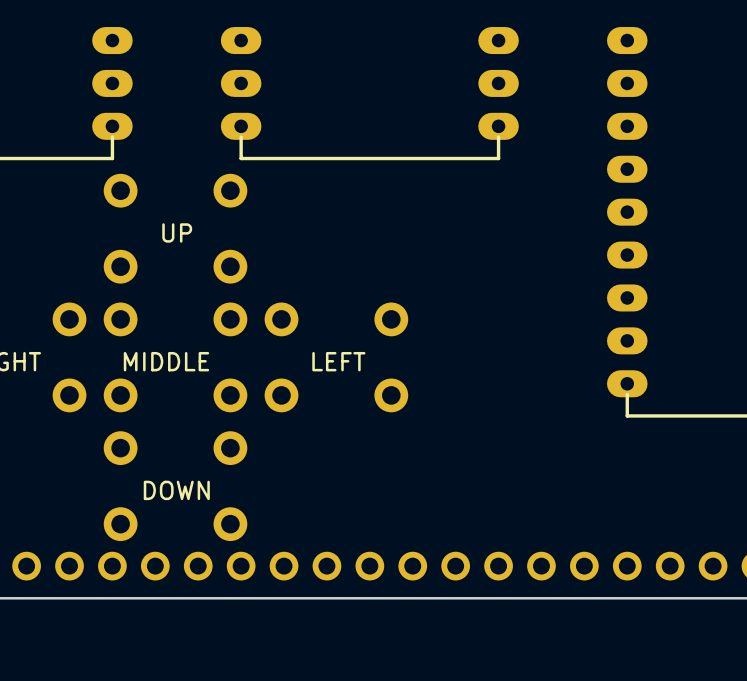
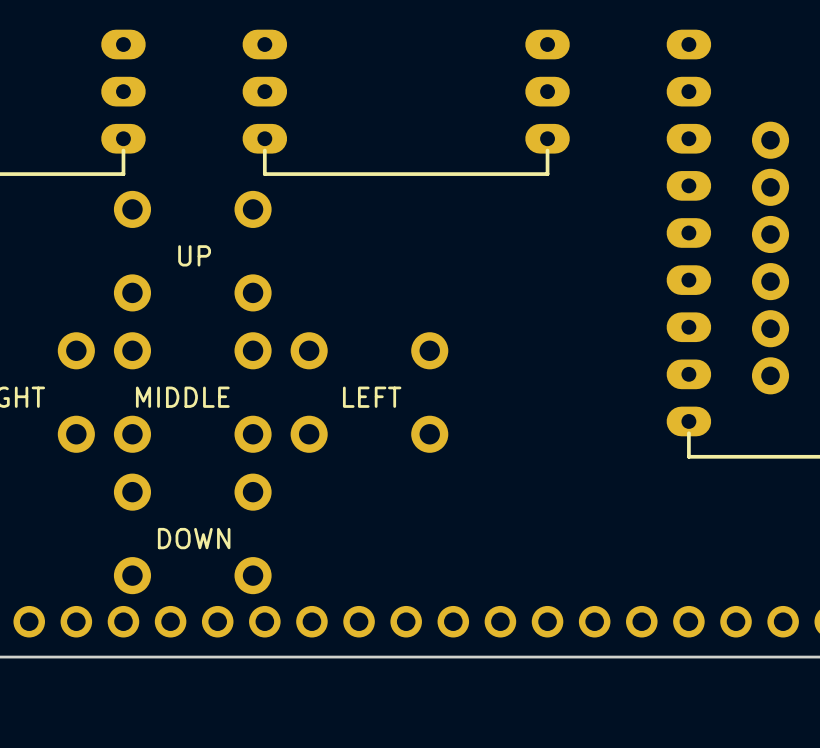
part: none -> (770, 258)

